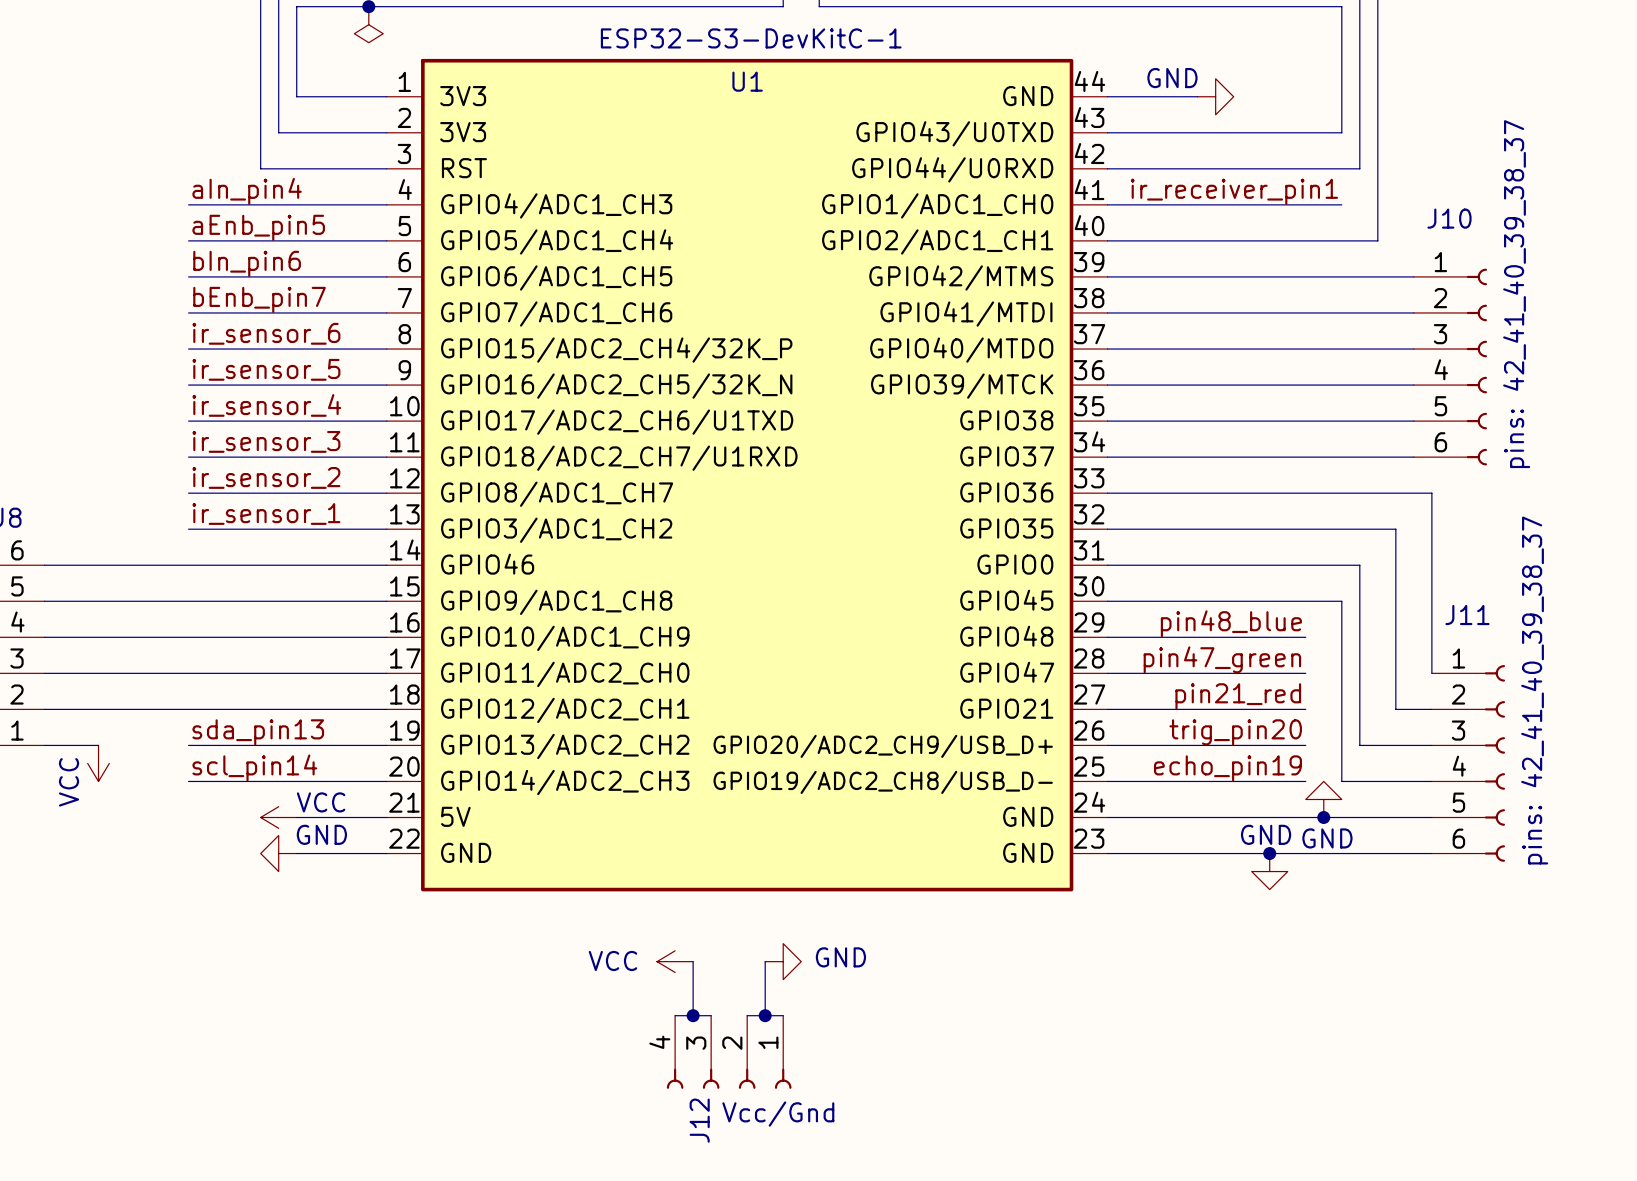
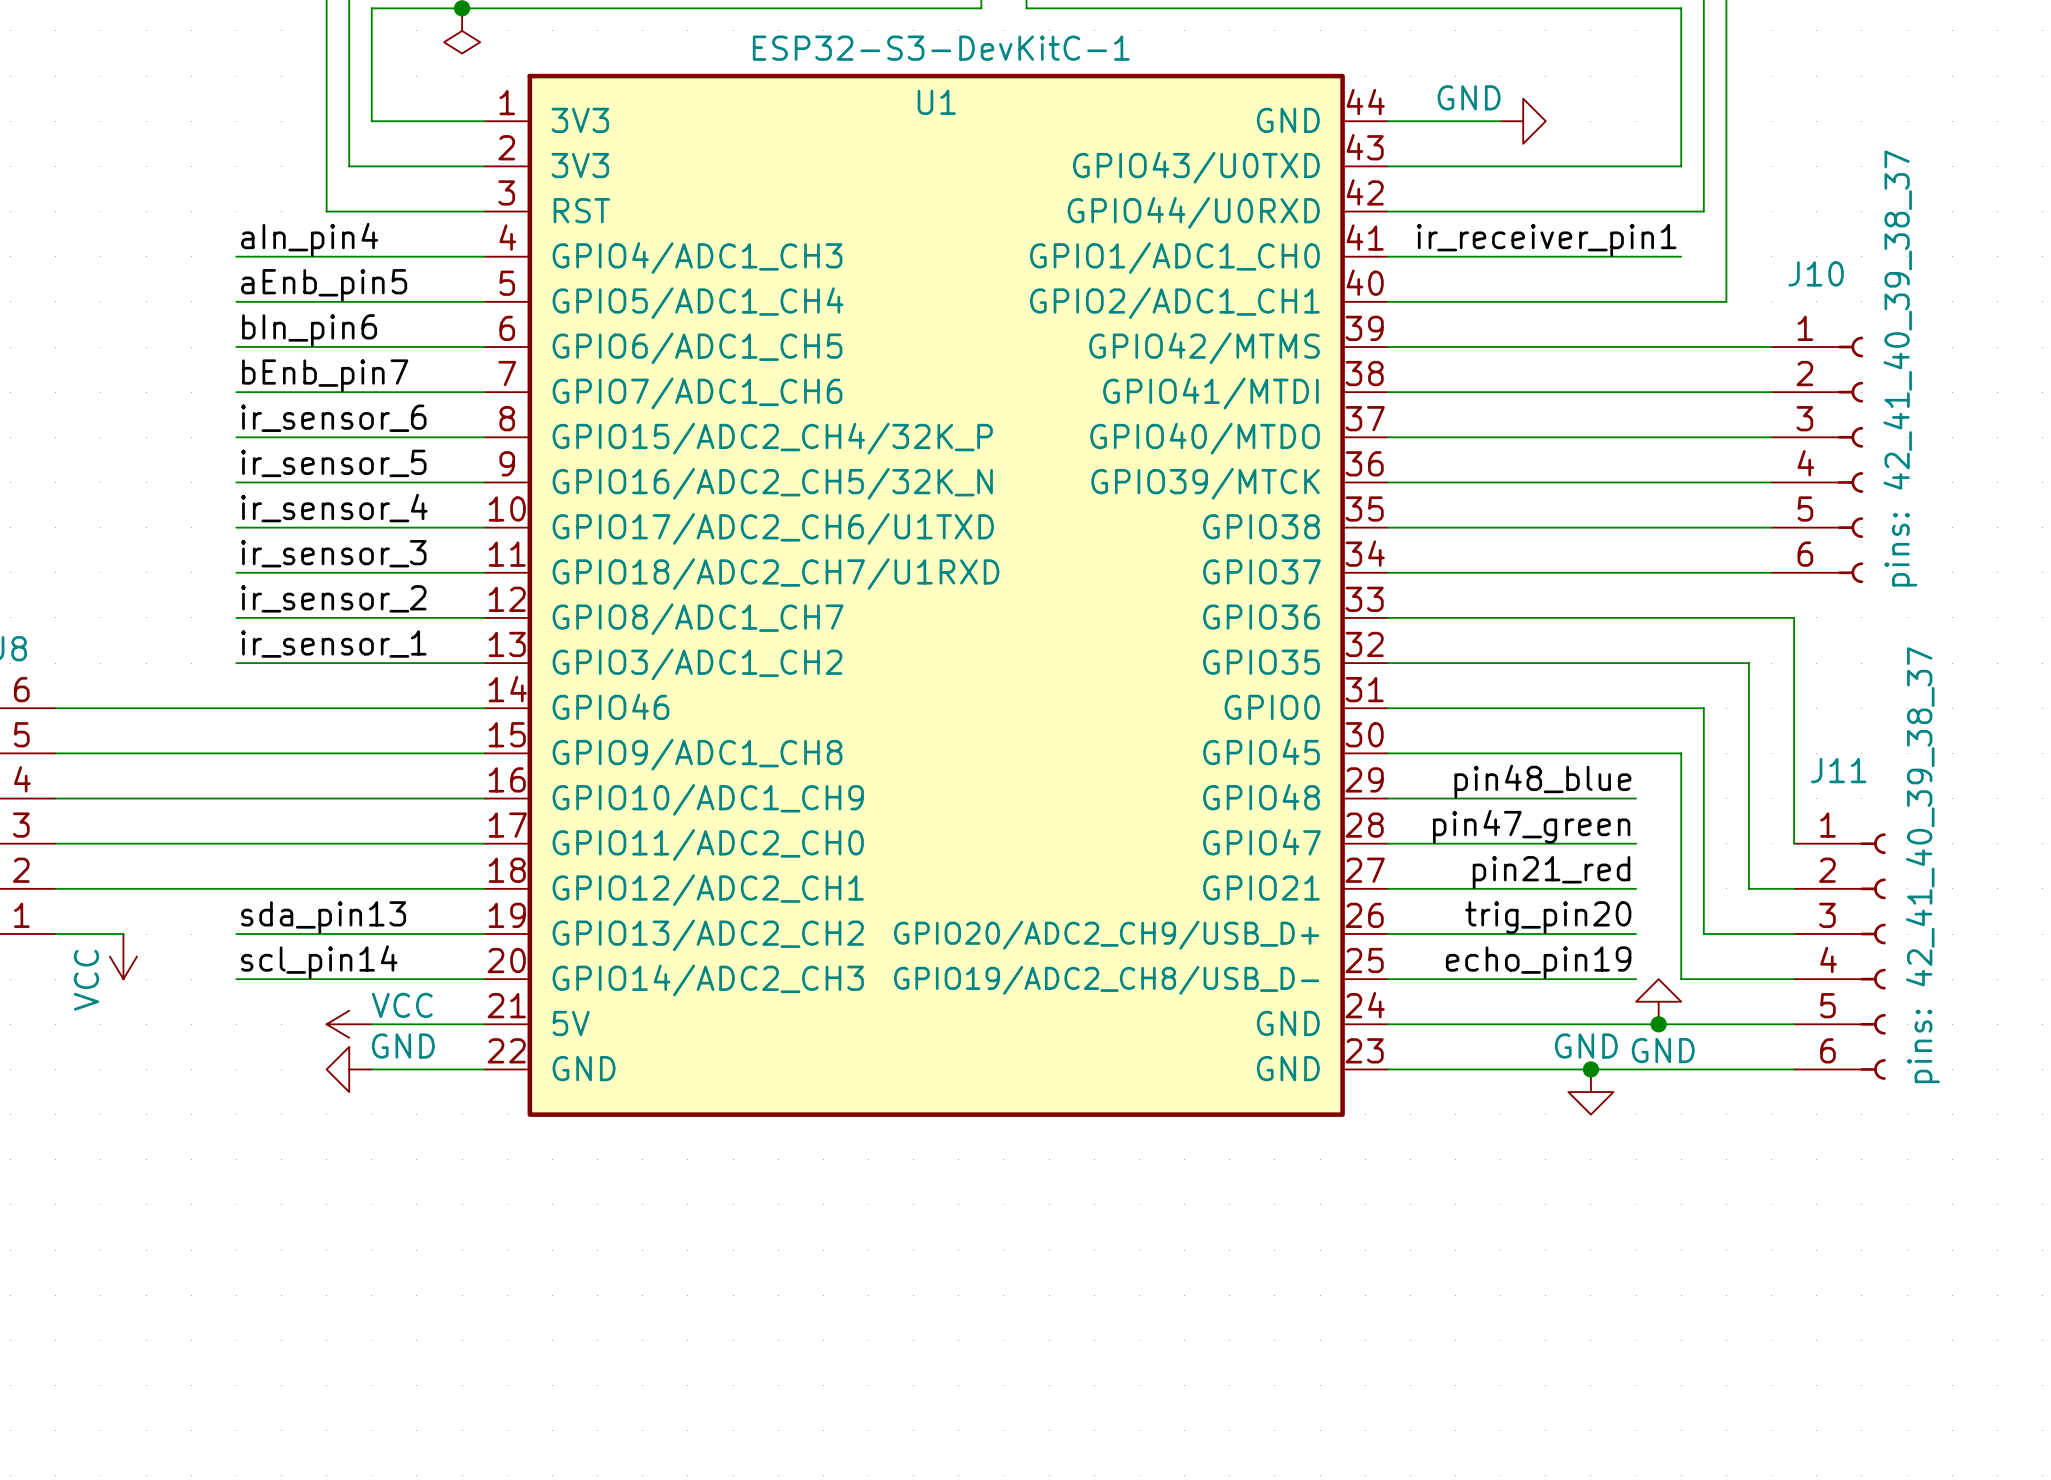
power symbol: VCC (675, 961) -> none
wire: (693, 961) (693, 1015) -> none
wire: (765, 961) (765, 1015) -> none
power symbol: GND (783, 961) -> none
wire: (675, 1015) (711, 1015) -> none
junction: (693, 1015) -> none
wire: (747, 1015) (783, 1015) -> none
junction: (765, 1015) -> none
J12: Vcc/Gnd (729, 1052) -> none

